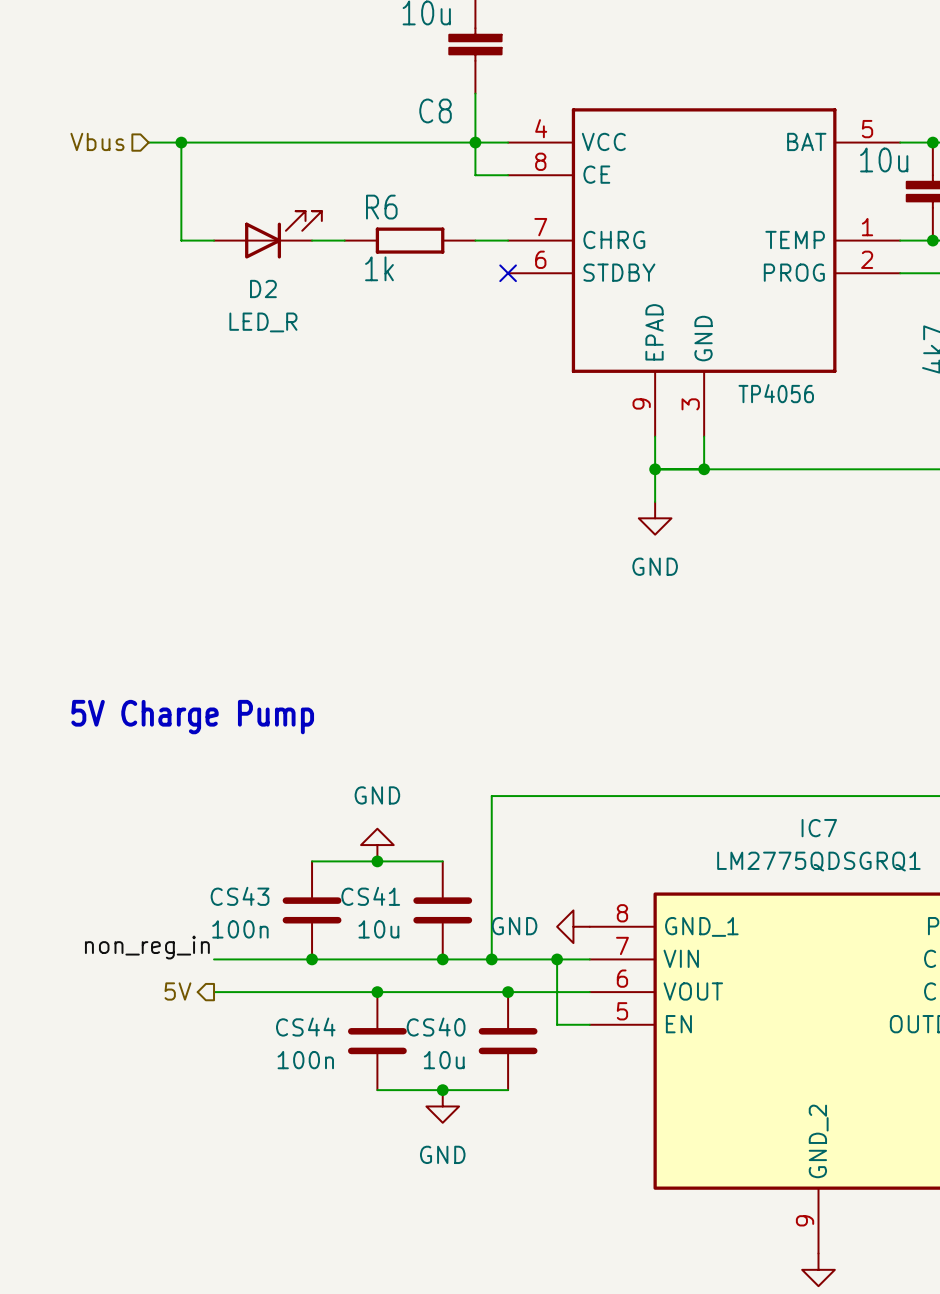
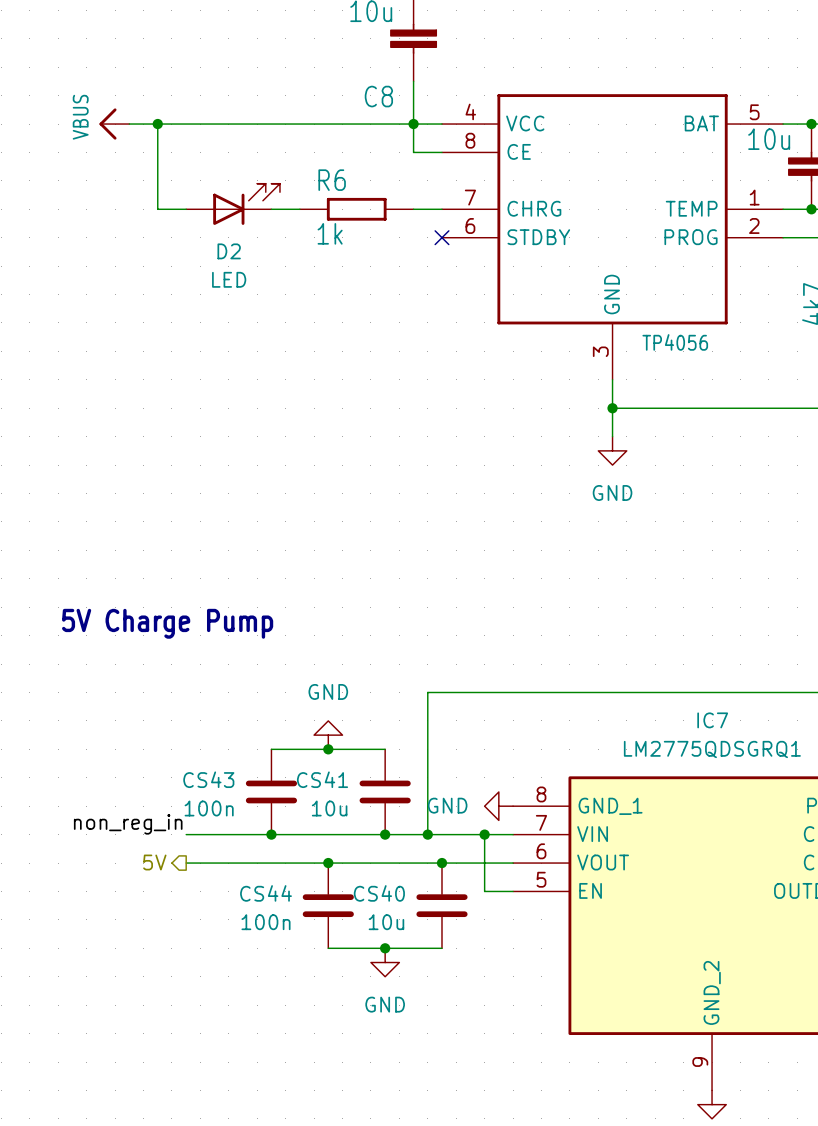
part symbol: [508, 108, 901, 437] -> [441, 94, 784, 380]
hierarchical label: Vbus (97, 141) -> none
power symbol: none -> VBUS (114, 124)
D2 value: LED_R (263, 322) -> LED (229, 279)
wire: (655, 436) (655, 501) -> none
wire: (655, 469) (704, 469) -> (612, 436) (612, 408)
junction: (655, 469) -> none
power symbol position: GND (655, 518) -> GND (612, 450)

